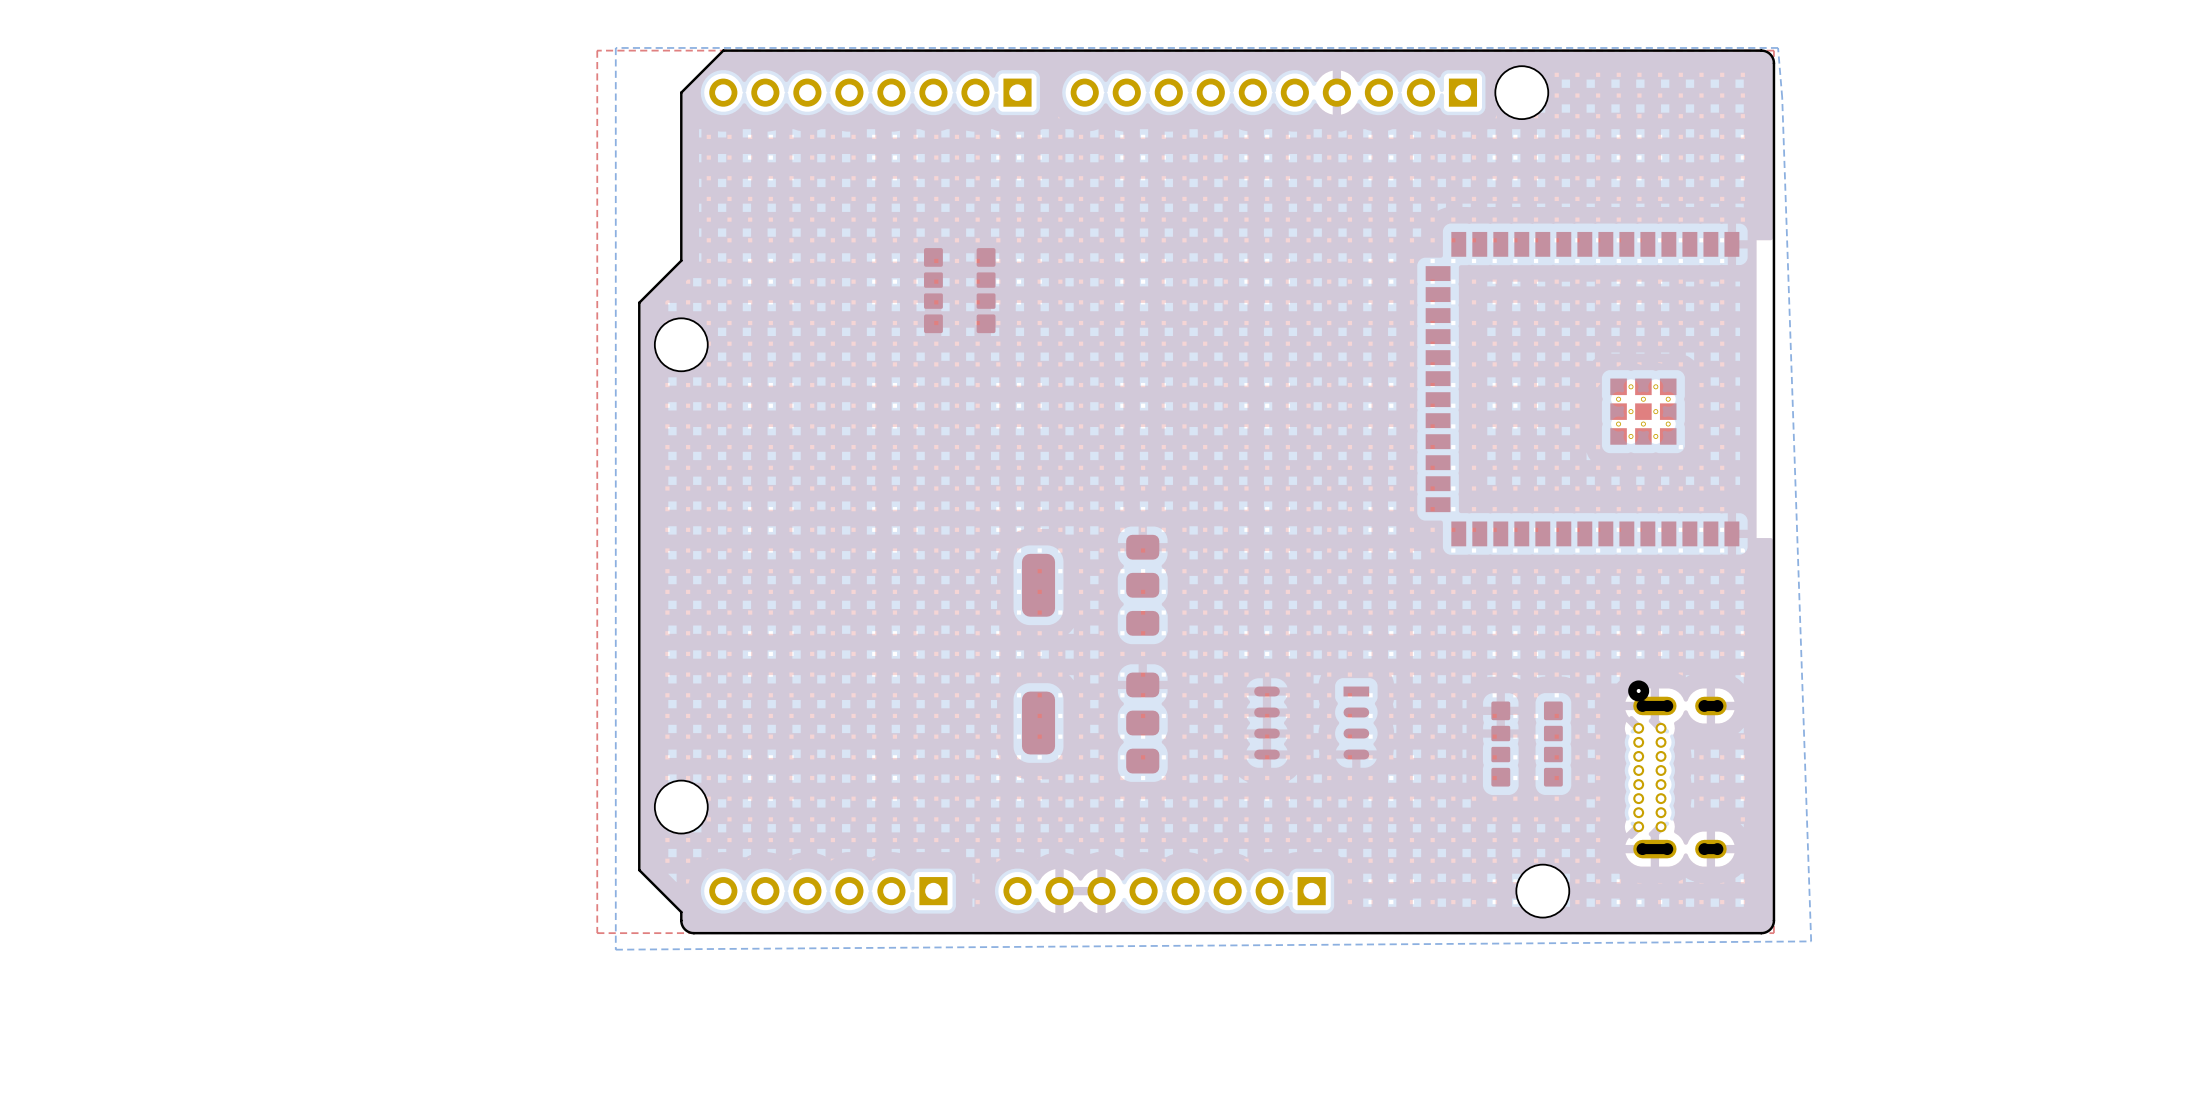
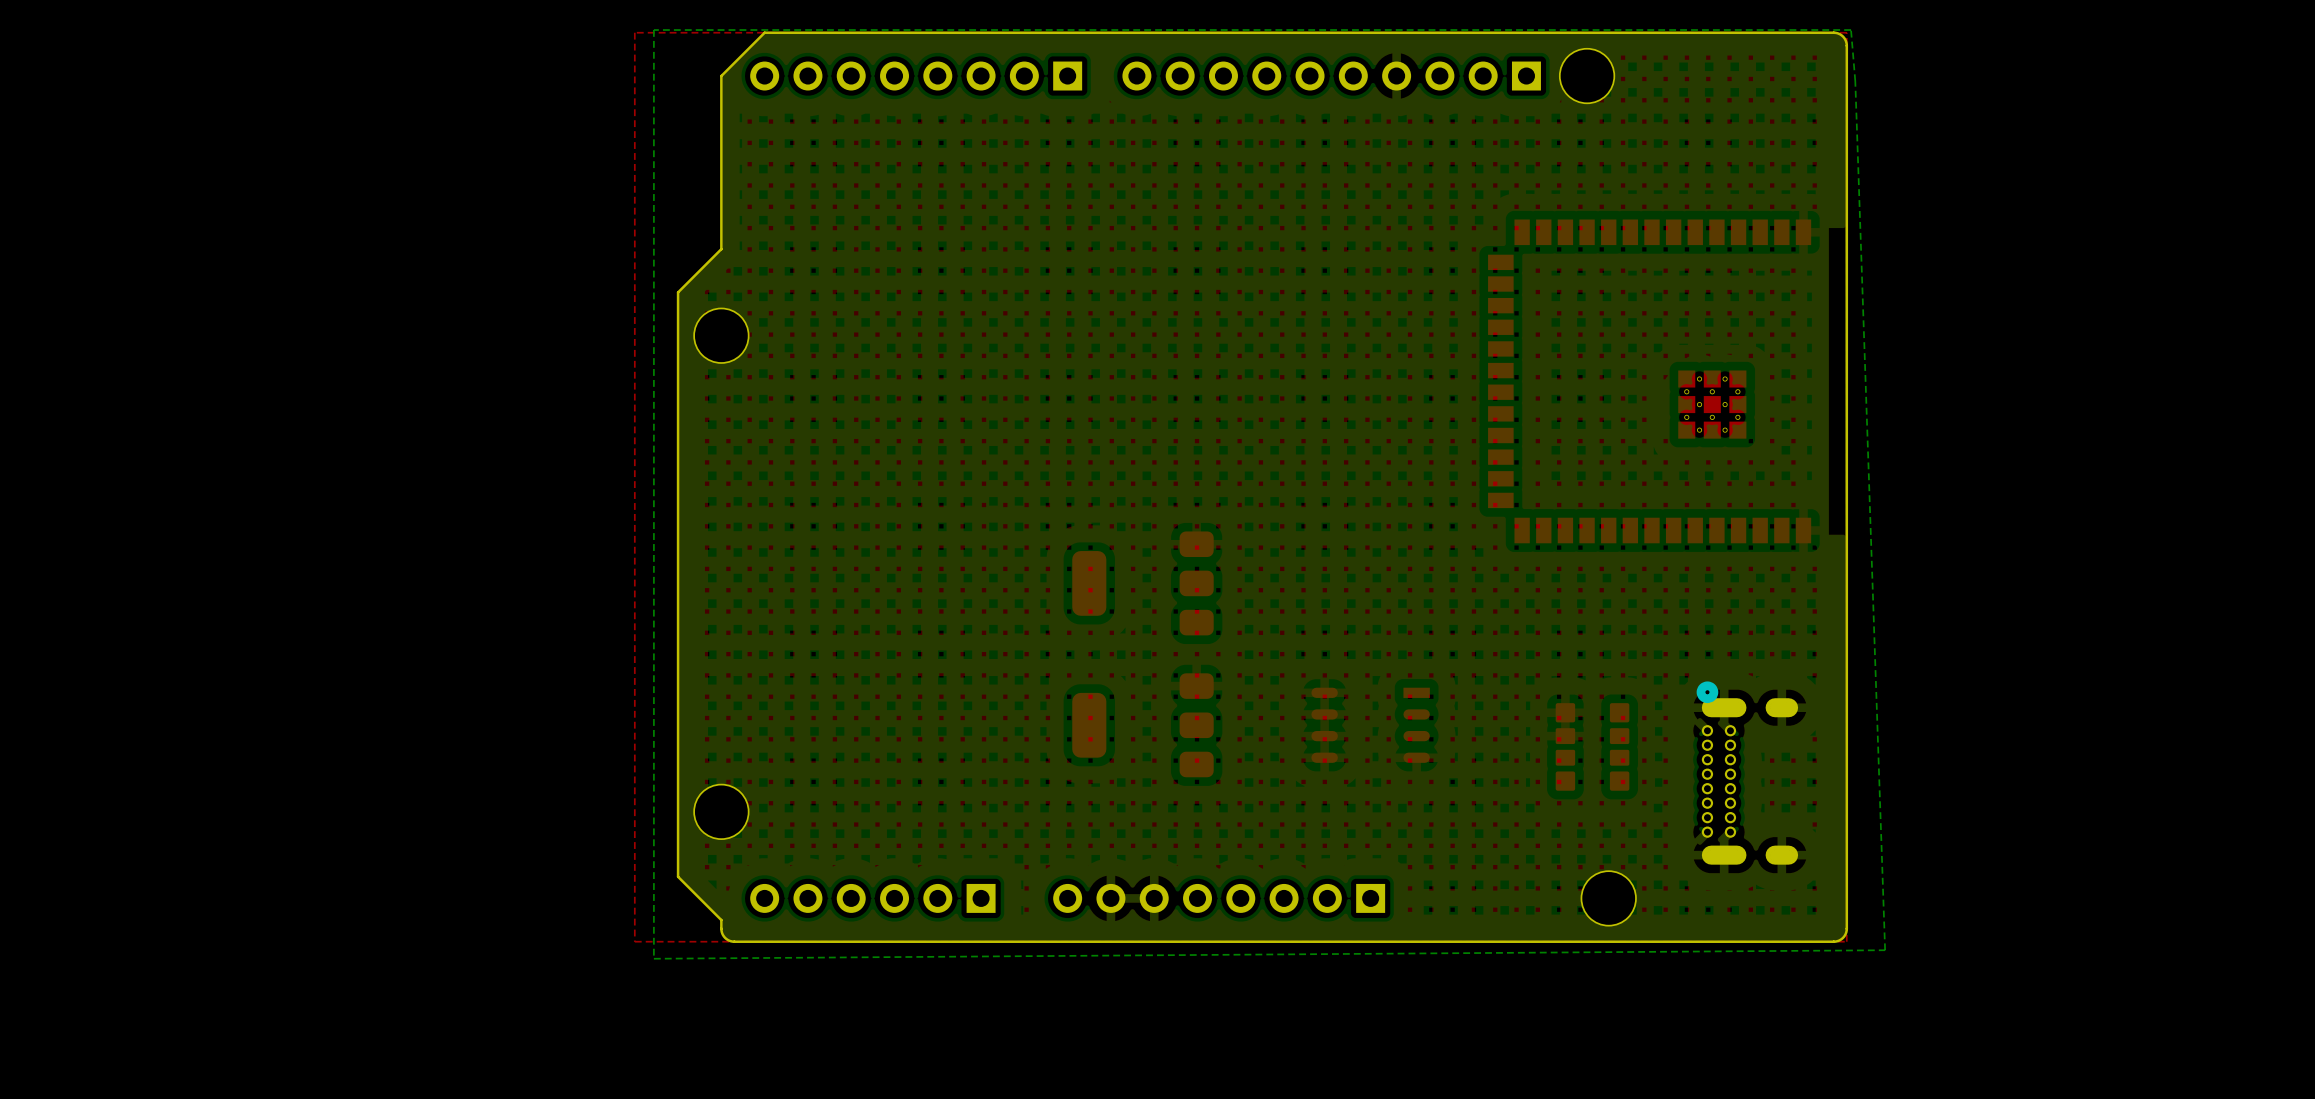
part: (959, 290) -> none

